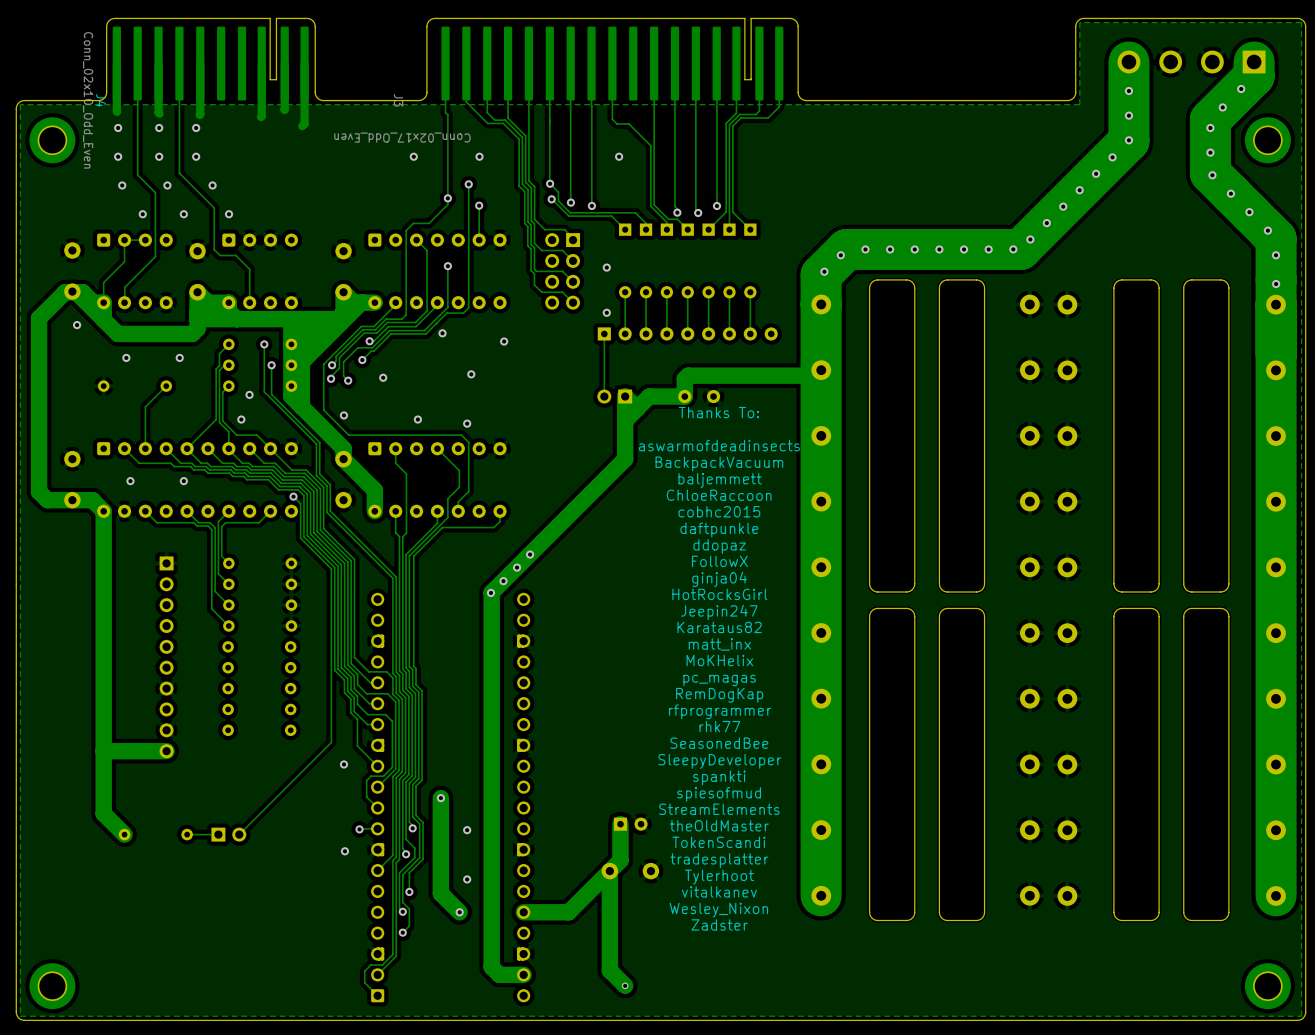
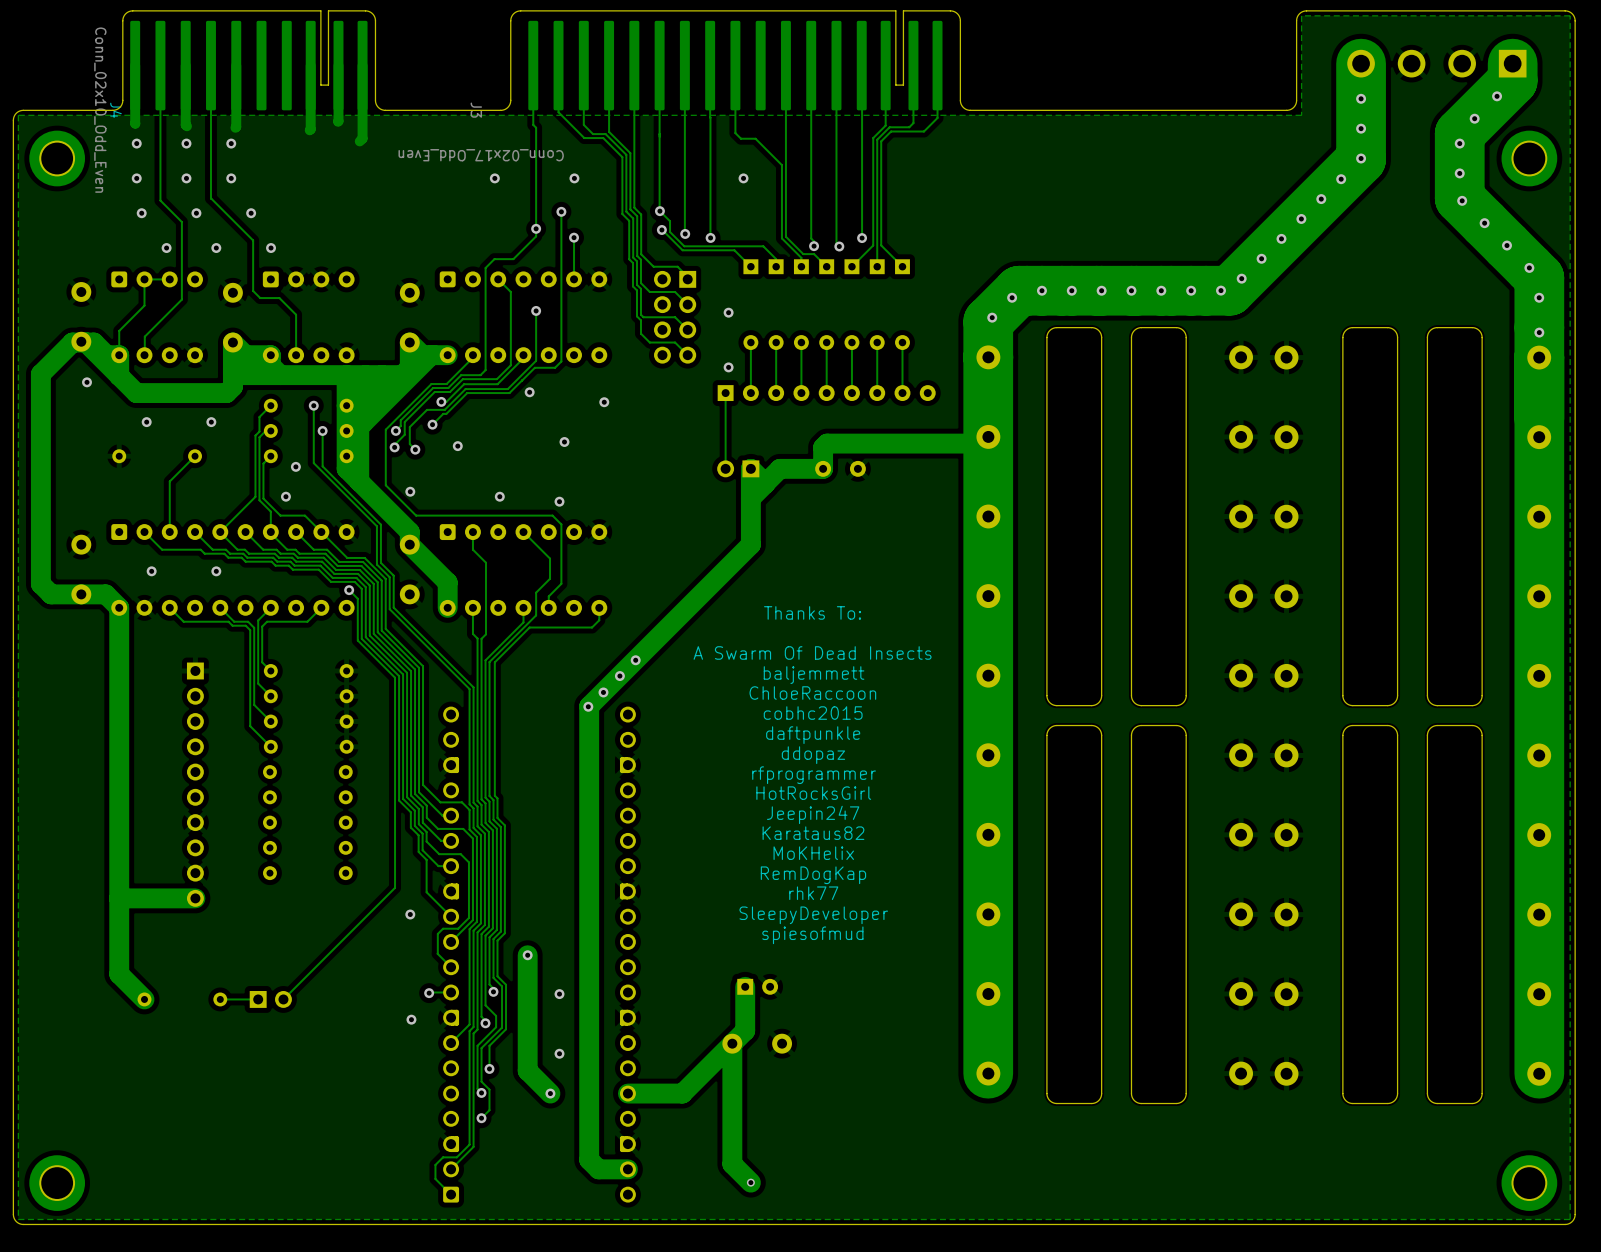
text position: Thanks To: (718, 412) -> Thanks To: (812, 612)
text: aswarmofdeadinsects (719, 445) -> none
text: BackpackVacuum (719, 463) -> none
text position: baljemmett (720, 480) -> baljemmett (814, 675)
text position: ChloeRaccoon (719, 495) -> ChloeRaccoon (812, 693)
text position: cobhc2015 (719, 511) -> cobhc2015 (813, 713)
text position: daftpunkle (719, 530) -> daftpunkle (813, 735)
text position: ddopaz (719, 546) -> ddopaz (813, 755)
text: none -> A Swarm Of Dead Insects (812, 652)
text: FollowX (719, 561) -> none
text: ginja04 (719, 579) -> none
text position: HotRocksGirl (719, 594) -> HotRocksGirl (813, 793)
text position: Jeepin247 (719, 612) -> Jeepin247 (813, 814)
text position: Karataus82 (719, 627) -> Karataus82 (813, 833)
text: matt_inx (719, 644) -> none
text position: MoKHelix (719, 660) -> MoKHelix (813, 853)
text: pc_magas (719, 680) -> none
text position: RemDogKap (719, 695) -> RemDogKap (813, 875)
text position: rfprogrammer (720, 711) -> rfprogrammer (814, 775)
text position: rhk77 (719, 726) -> rhk77 (813, 893)
text: SeasonedBee (719, 743) -> none
text position: SleepyDeveloper (719, 761) -> SleepyDeveloper (813, 915)
text: spankti (719, 777) -> none
text position: spiesofmud (719, 794) -> spiesofmud (812, 935)
text: StreamElements (719, 809) -> none
text: theOldMaster (719, 825) -> none
text: TokenScandi (718, 842) -> none
text: tradesplatter (719, 860) -> none
text: Tylerhoot (719, 877) -> none
text: vitalkanev (719, 891) -> none
text: Wesley_Nixon (718, 910) -> none
text: Zadster (719, 924) -> none

